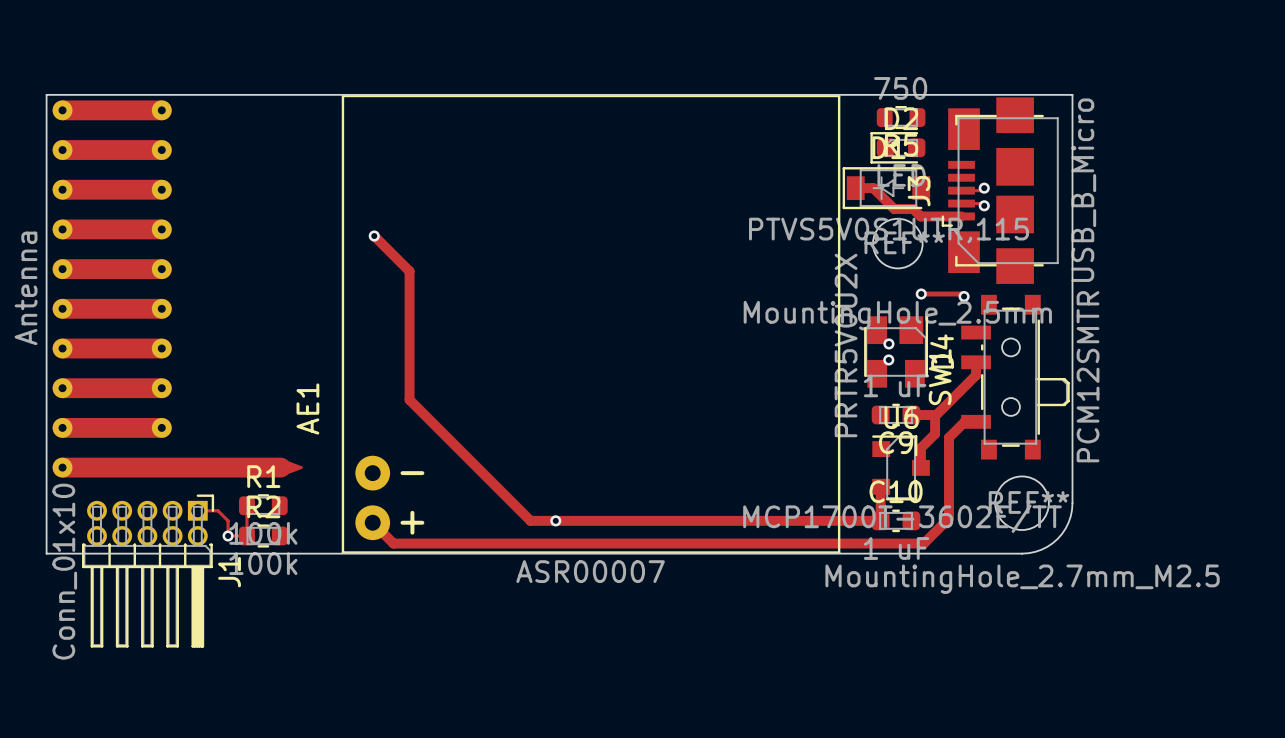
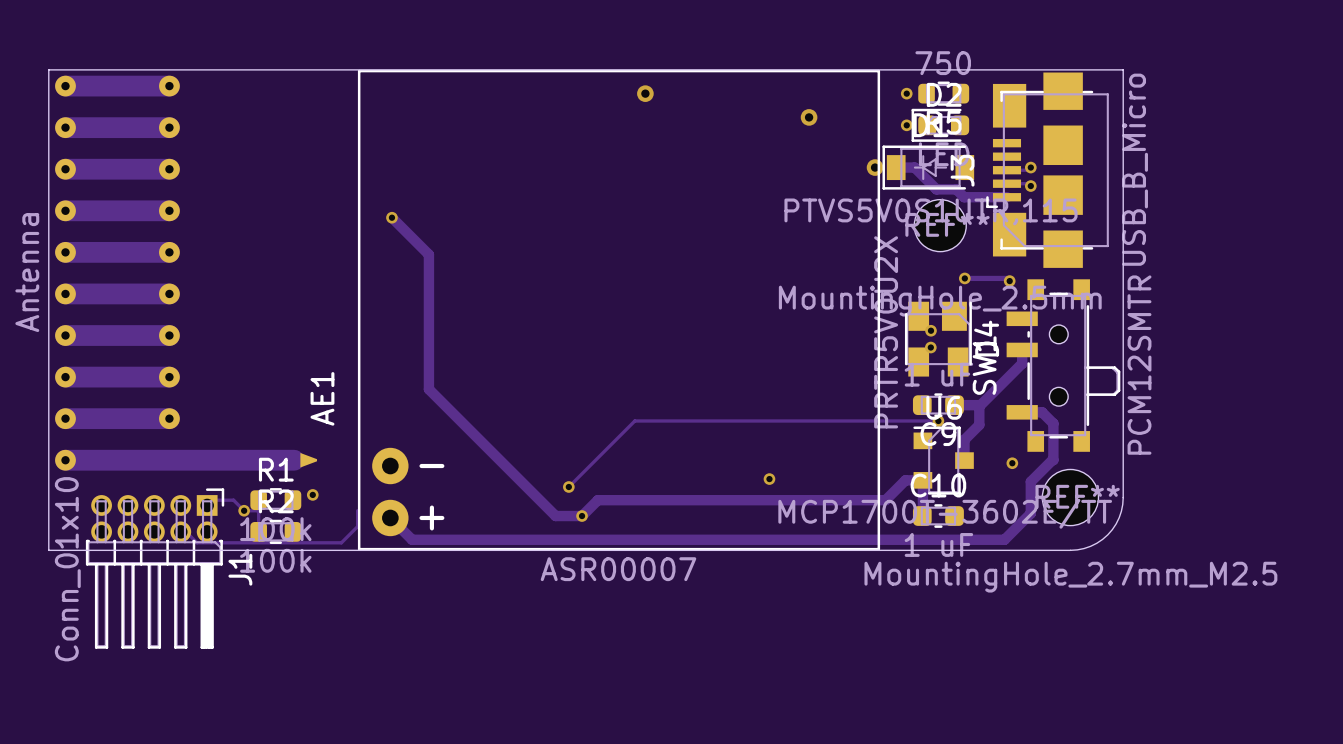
via: none -> (645, 93)
via: none -> (906, 93)
via: none -> (809, 117)
via: none -> (906, 125)
via: none -> (875, 167)
track: (976, 421) (964, 421) (948, 437) (948, 518) (923, 543) -> (1022, 412) (1042, 412) (1053, 423) (1053, 460) (1030, 481) (1030, 513) (1004, 539) (967, 539)
track: none -> (938, 420) (634, 420) (568, 486)
via: none -> (938, 420)
via: none -> (1012, 463)
via: none -> (769, 479)
track: (880, 487) (880, 520) (555, 520) -> (922, 516) (922, 480) (905, 480) (885, 500) (597, 500) (582, 516)
via: none -> (568, 486)
via: none -> (312, 494)
track: none -> (207, 500) (233, 500) (244, 510) (258, 509)
track: (197, 510) (217, 510) (228, 520) (228, 535) (246, 535) (246, 530) -> none
track: none -> (357, 510) (357, 526) (341, 542) (196, 542) (180, 526)
via position: (228, 535) -> (244, 510)

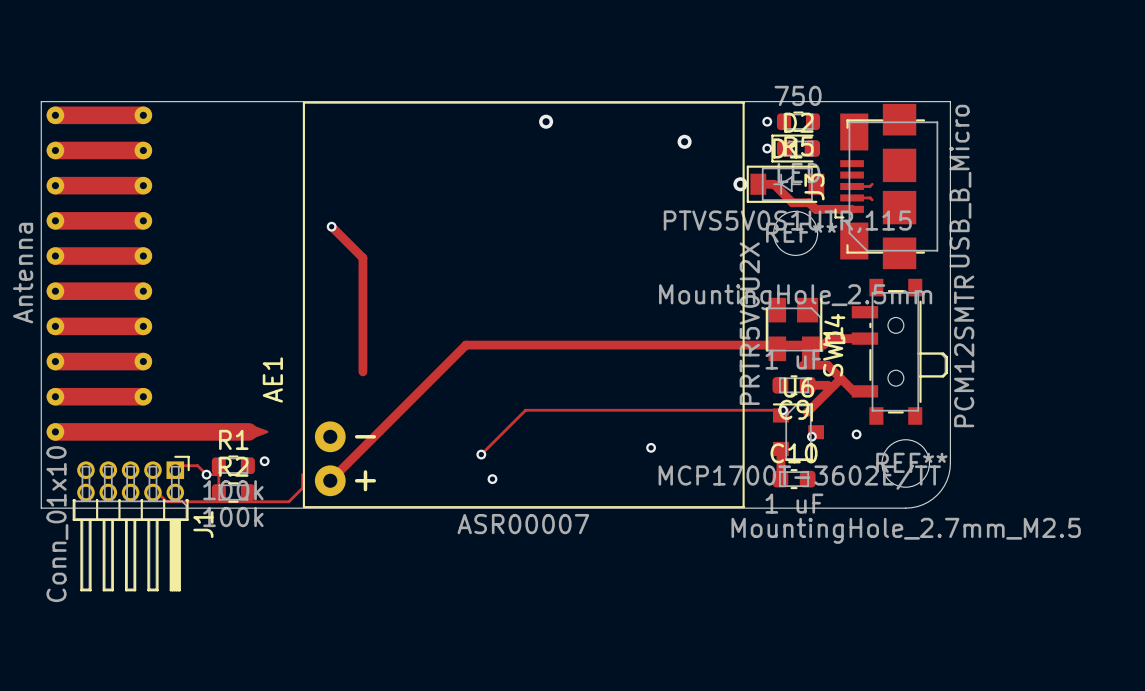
via: (1030, 167) -> none
via: (1030, 186) -> none
track: (964, 278) (1007, 278) (1009, 281) -> none
via: (964, 278) -> none
via: (1009, 281) -> none
via: (930, 330) -> none
via: (930, 347) -> none
track: (1022, 349) (1022, 363) (979, 406) (979, 424) (964, 439) (964, 460) -> none
track: none -> (803, 365) (827, 365) (853, 391) (864, 391)
track: (428, 389) (555, 516) (582, 516) (597, 500) (885, 500) (905, 480) (922, 480) -> none
track: none -> (840, 378) (807, 412)
track: (1022, 412) (1042, 412) (1053, 423) (1053, 460) (1030, 481) (1030, 513) (1004, 539) (412, 539) (390, 517) -> (858, 338) (829, 338) (823, 345) (465, 345) (330, 480)
track: (938, 420) (634, 420) (621, 434) -> (783, 410) (525, 410)
via position: (938, 420) -> (783, 410)
via: none -> (811, 436)

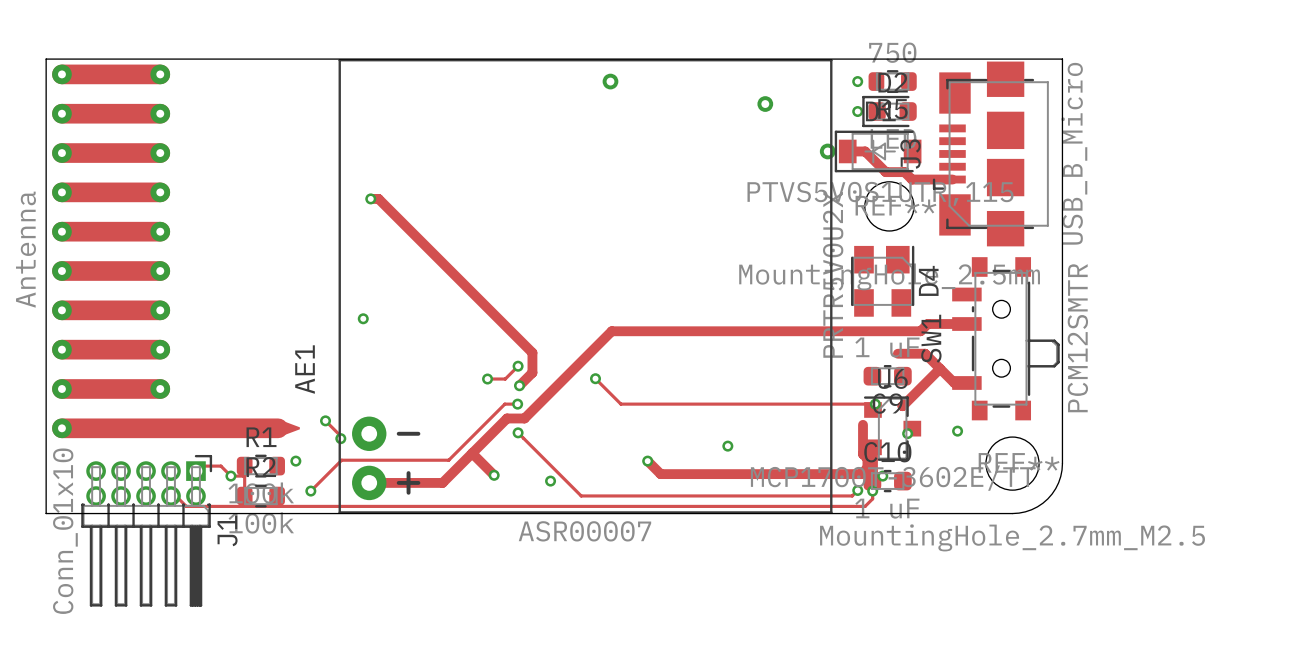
track: (872, 184) (869, 186) (852, 186) -> none
track: (852, 197) (870, 197) (872, 199) -> none
track: (331, 226) (362, 257) (362, 371) -> (370, 198) (378, 198) (532, 352) (532, 372) (519, 385)
D4 position: (794, 329) -> (882, 281)
via: none -> (363, 318)
track: (547, 345) (465, 345) (330, 480) -> (611, 331) (524, 418) (507, 418) (442, 482) (369, 482)
track: none -> (518, 366) (505, 379) (487, 379)
via: none -> (518, 366)
track: (807, 385) (828, 386) -> none
via: none -> (487, 379)
via: none -> (595, 378)
via: none -> (519, 385)
track: none -> (517, 404) (504, 404) (448, 460) (341, 460) (310, 491)
via: none -> (517, 404)
track: (555, 410) (525, 410) (481, 454) -> (620, 404) (595, 378)
track: none -> (325, 420) (340, 436) (340, 438)
via: none -> (325, 420)
track: none -> (863, 424) (863, 454) (867, 458) (867, 467) (861, 474) (660, 474) (647, 461)
track: none -> (518, 432) (581, 495) (852, 495) (857, 490)
via: none -> (518, 432)
via: none -> (340, 438)
track: none -> (472, 452) (494, 475)
via: (481, 454) -> none
via: none -> (647, 461)
via: none -> (494, 475)
track: (302, 474) (302, 488) (288, 501) -> (872, 491) (872, 498) (865, 506) (322, 506)
via: none -> (882, 476)
via: none -> (857, 490)
via: none -> (310, 491)
via: none -> (872, 491)

